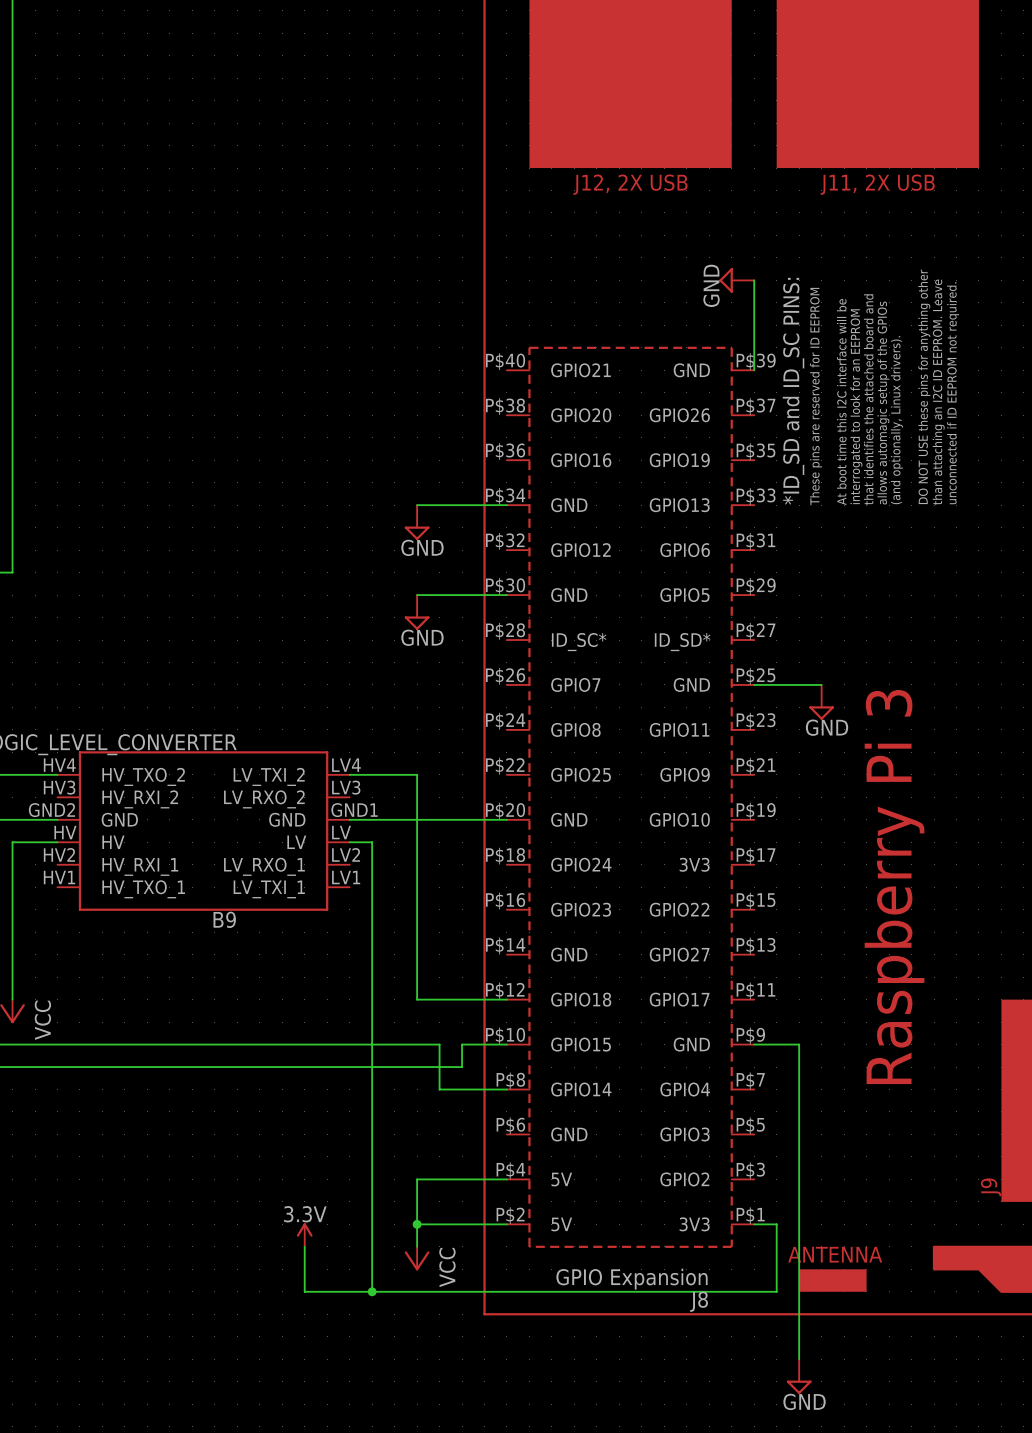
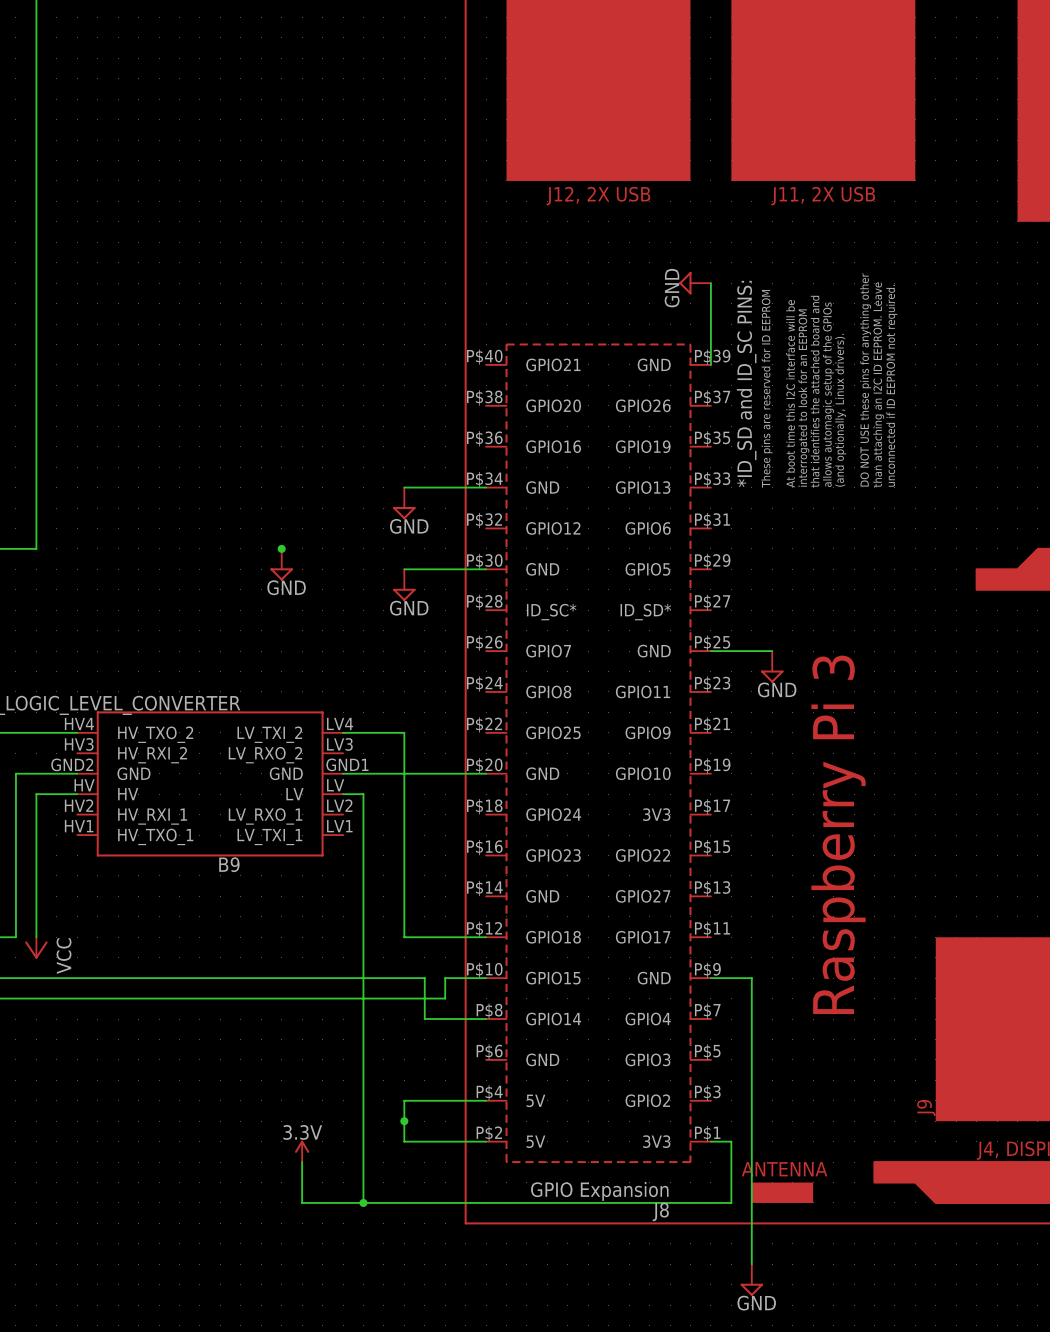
junction: none -> (281, 548)
power symbol: none -> GND (281, 564)
wire: (417, 1224) (417, 1246) -> none
junction position: (417, 1224) -> (404, 1121)
power symbol: VCC (417, 1258) -> none

